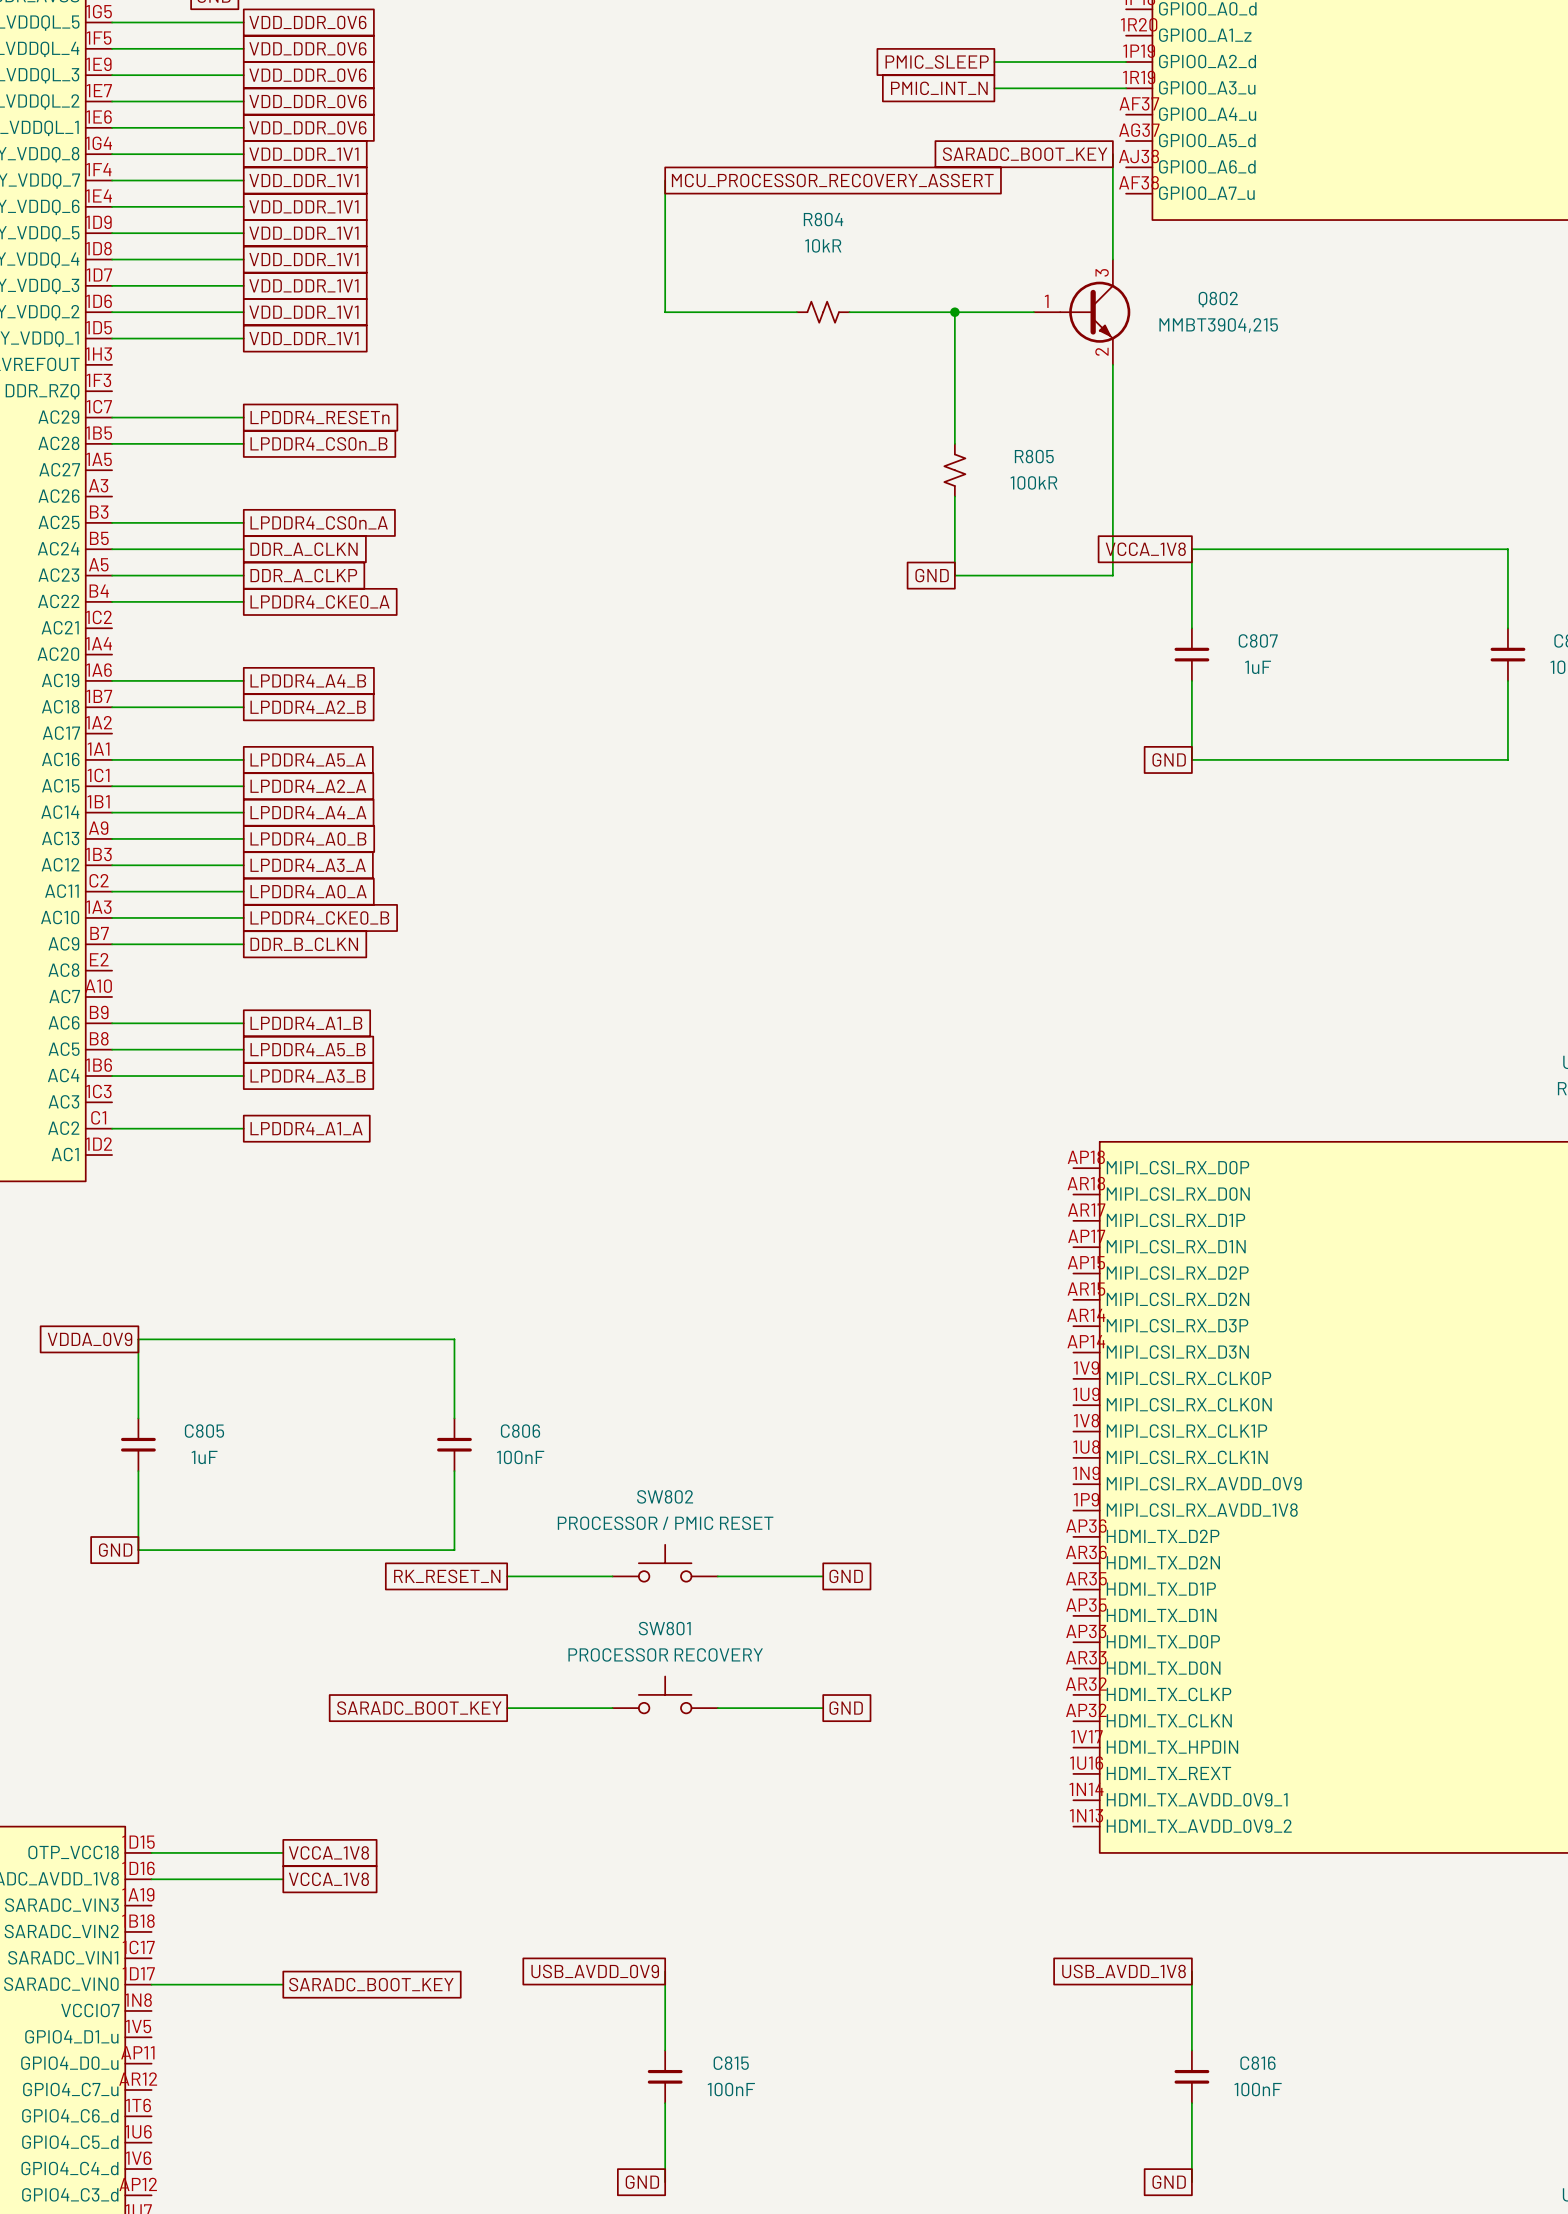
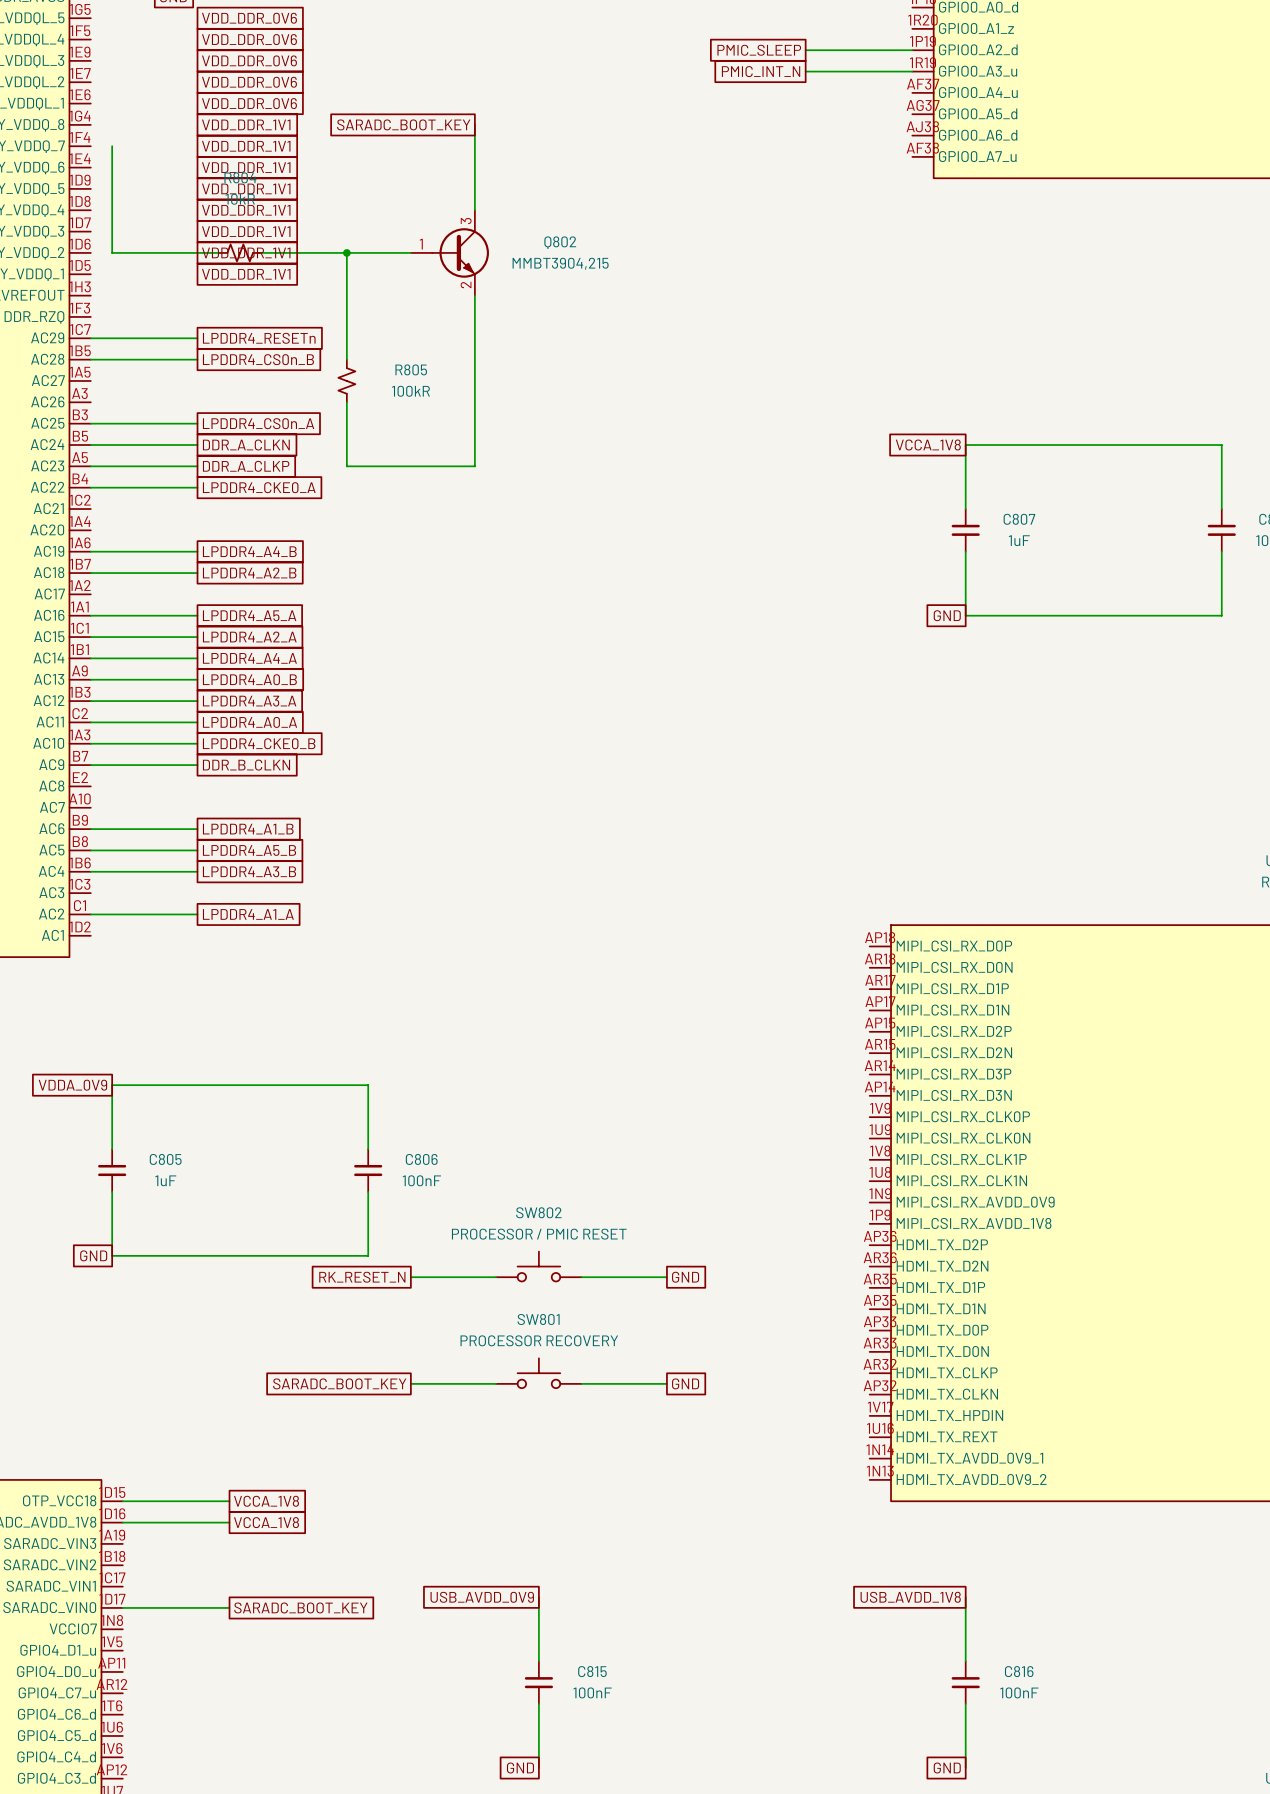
wire: (112, 22) (243, 22) -> none
wire: (112, 48) (243, 48) -> none
wire: (112, 75) (243, 75) -> none
wire: (112, 101) (243, 101) -> none
wire: (112, 127) (243, 127) -> none
wire: (112, 154) (243, 154) -> none
global label: none -> SARADC_BOOT_KEY (403, 124)
wire: none -> (474, 124) (474, 210)
global label: SARADC_BOOT_KEY (1025, 154) -> none
wire: (1112, 154) (1112, 259) -> none
wire: (112, 180) (243, 180) -> none
wire: (665, 180) (665, 312) (796, 312) -> none
global label: MCU_PROCESSOR_RECOVERY_ASSERT (832, 180) -> none
wire: (112, 206) (243, 206) -> none
wire: (112, 233) (243, 233) -> none
wire: (112, 259) (243, 259) -> none
wire: (112, 285) (243, 285) -> none
wire: (112, 312) (138, 312) -> (112, 146) (112, 252)
wire: none -> (197, 252) (218, 252)
wire: none -> (261, 252) (410, 252)
wire: none -> (346, 252) (346, 359)
junction: none -> (346, 252)
R804 position: (823, 312) -> (240, 252)
wire: (849, 312) (1033, 312) -> none
wire: (954, 312) (954, 443) -> none
junction: (954, 312) -> none
Q802 position: (1082, 312) -> (449, 252)
wire: (112, 338) (243, 338) -> none
wire: none -> (474, 295) (474, 466) (346, 466) (346, 402)
wire: (1112, 364) (1112, 575) (954, 575) (954, 496) -> none
R805 position: (954, 470) -> (346, 380)
global label: GND (932, 575) -> none

